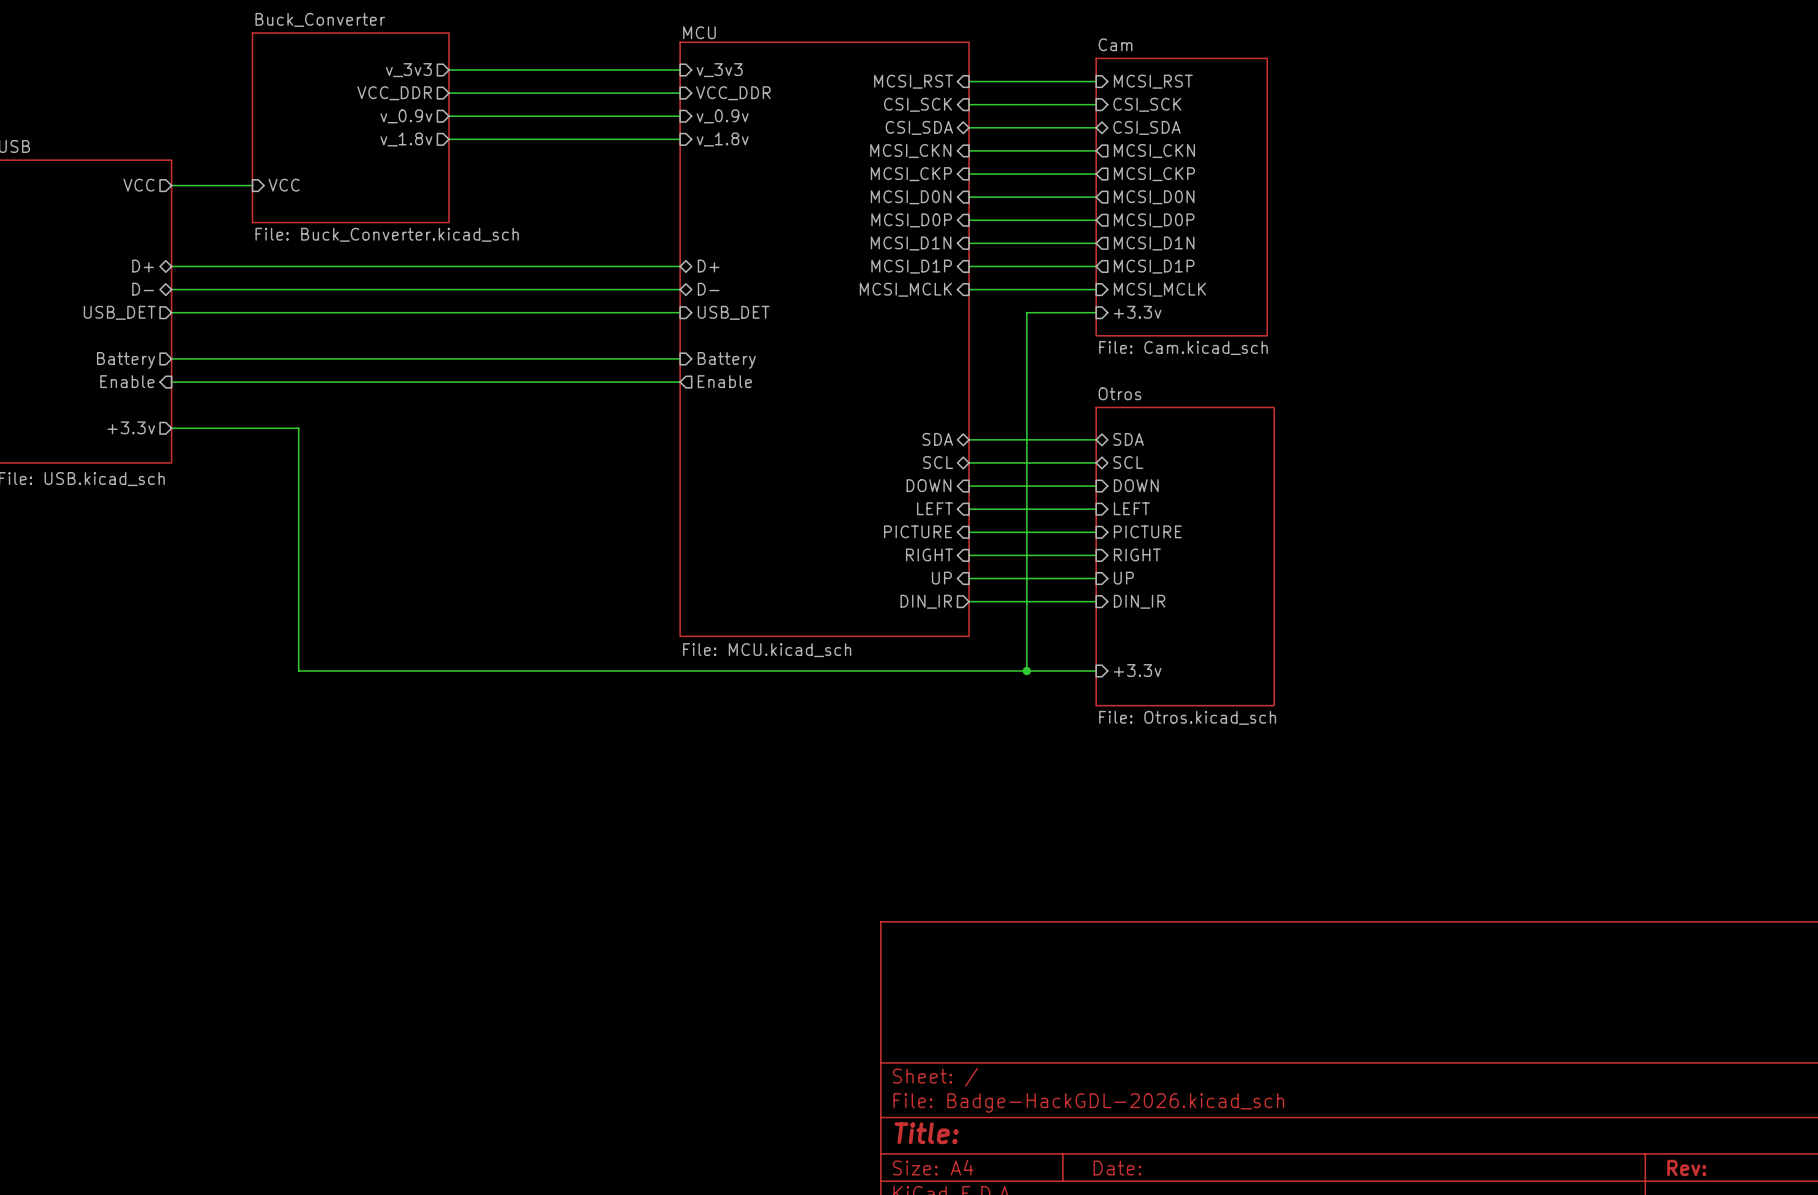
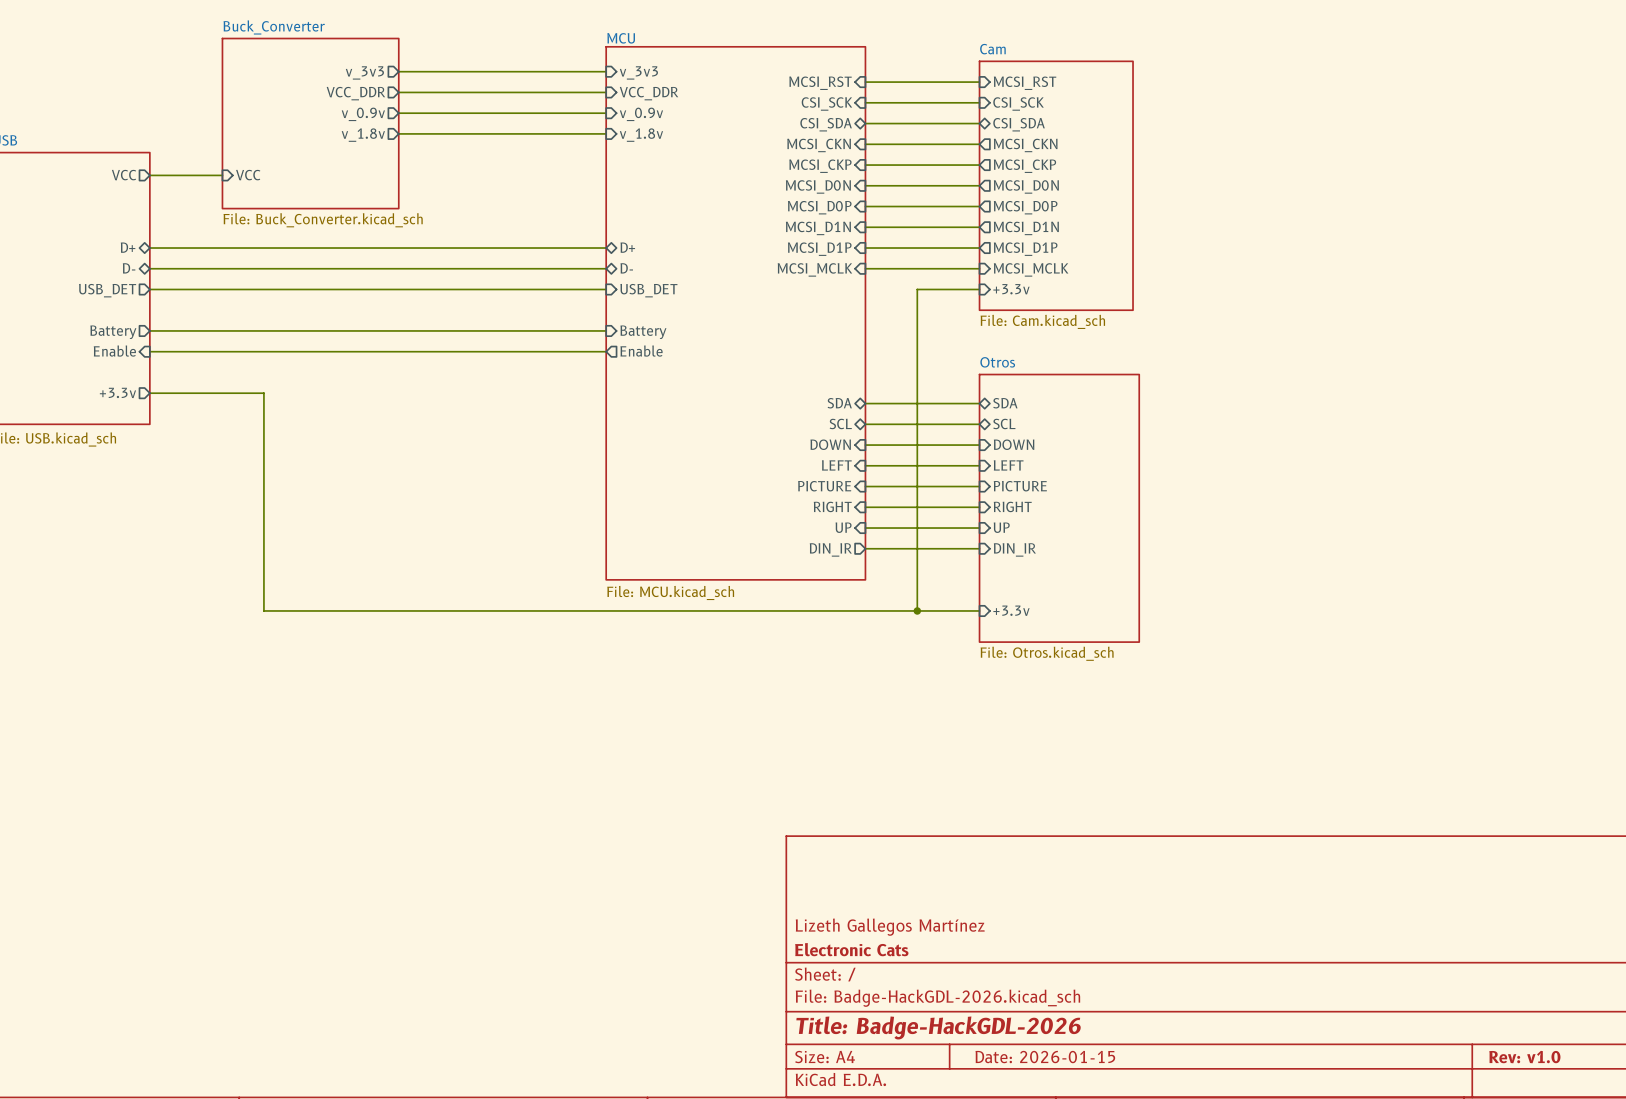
title block: none -> Lizeth Gallegos Martínez (890, 927)
title block: none -> Electronic Cats (851, 949)
title block: Title: (926, 1133) -> Title: Badge-HackGDL-2026 (938, 1027)
title block: Date: (1117, 1167) -> Date: 2026-01-15 (1045, 1057)
title block: Rev: (1686, 1167) -> Rev: v1.0 (1524, 1057)

